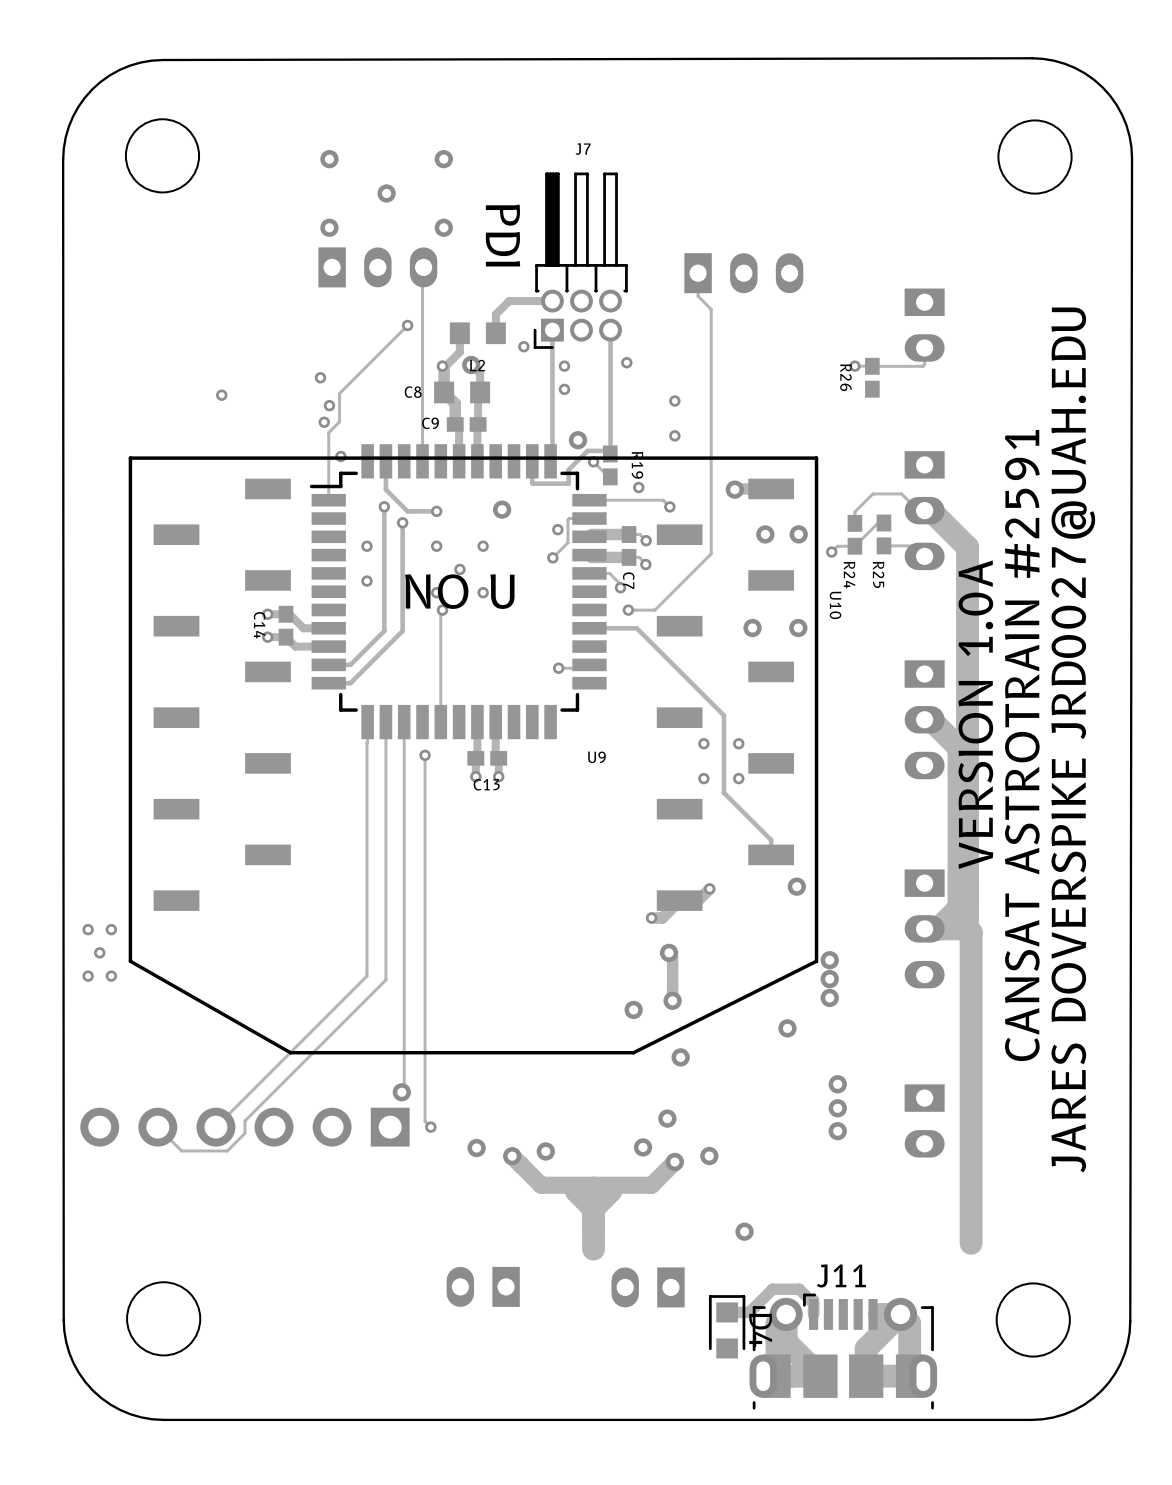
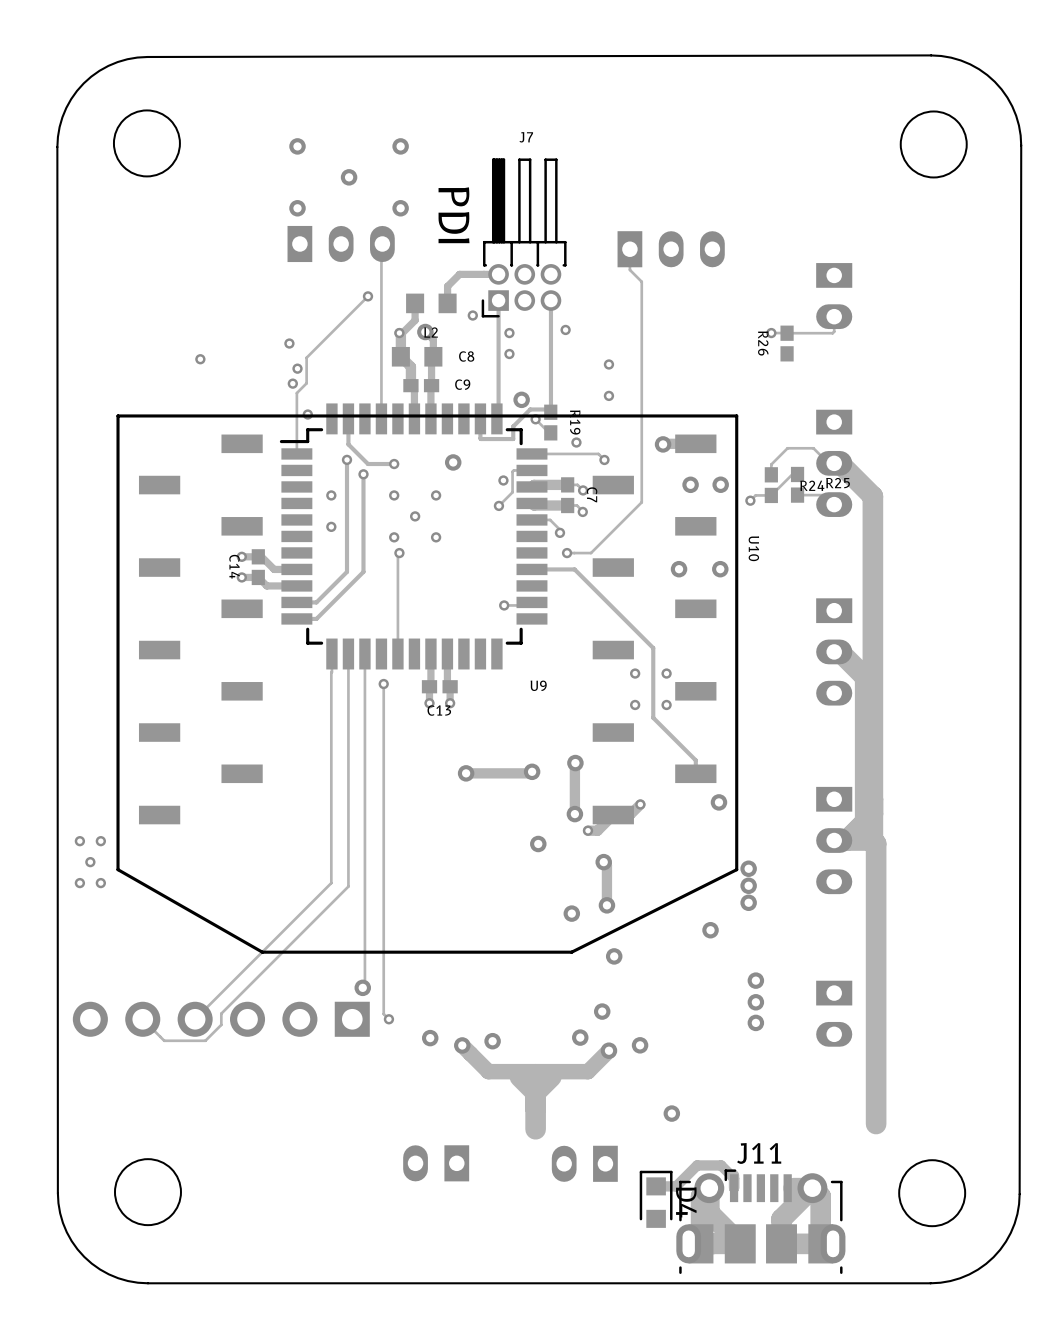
C8 name position: C8 (413, 392) -> C8 (466, 356)
C9 name position: C9 (430, 423) -> C9 (462, 384)
R25 name rotation: 0° (878, 574) -> 90° counterclockwise (838, 483)
R25 name position: R25 (878, 574) -> R25 (838, 483)
R24 name rotation: 0° (849, 575) -> 90° counterclockwise (812, 485)
R24 name position: R24 (849, 575) -> R24 (812, 485)
C7 name position: C7 (628, 580) -> C7 (592, 494)
text: NO U (459, 591) -> none
text: VERSION 1.0A (975, 714) -> none
text: JARES DOVERSPIKE JRD0027@UAH.EDU (1073, 739) -> none
text: CANSAT ASTROTRAIN #2591 (1022, 745) -> none
track: none -> (575, 763) (574, 814)
via: none -> (575, 763)
track: none -> (532, 771) (530, 773) (466, 773)
via: none -> (532, 771)
via: none -> (466, 773)
via: none -> (574, 814)
via: none -> (538, 844)

